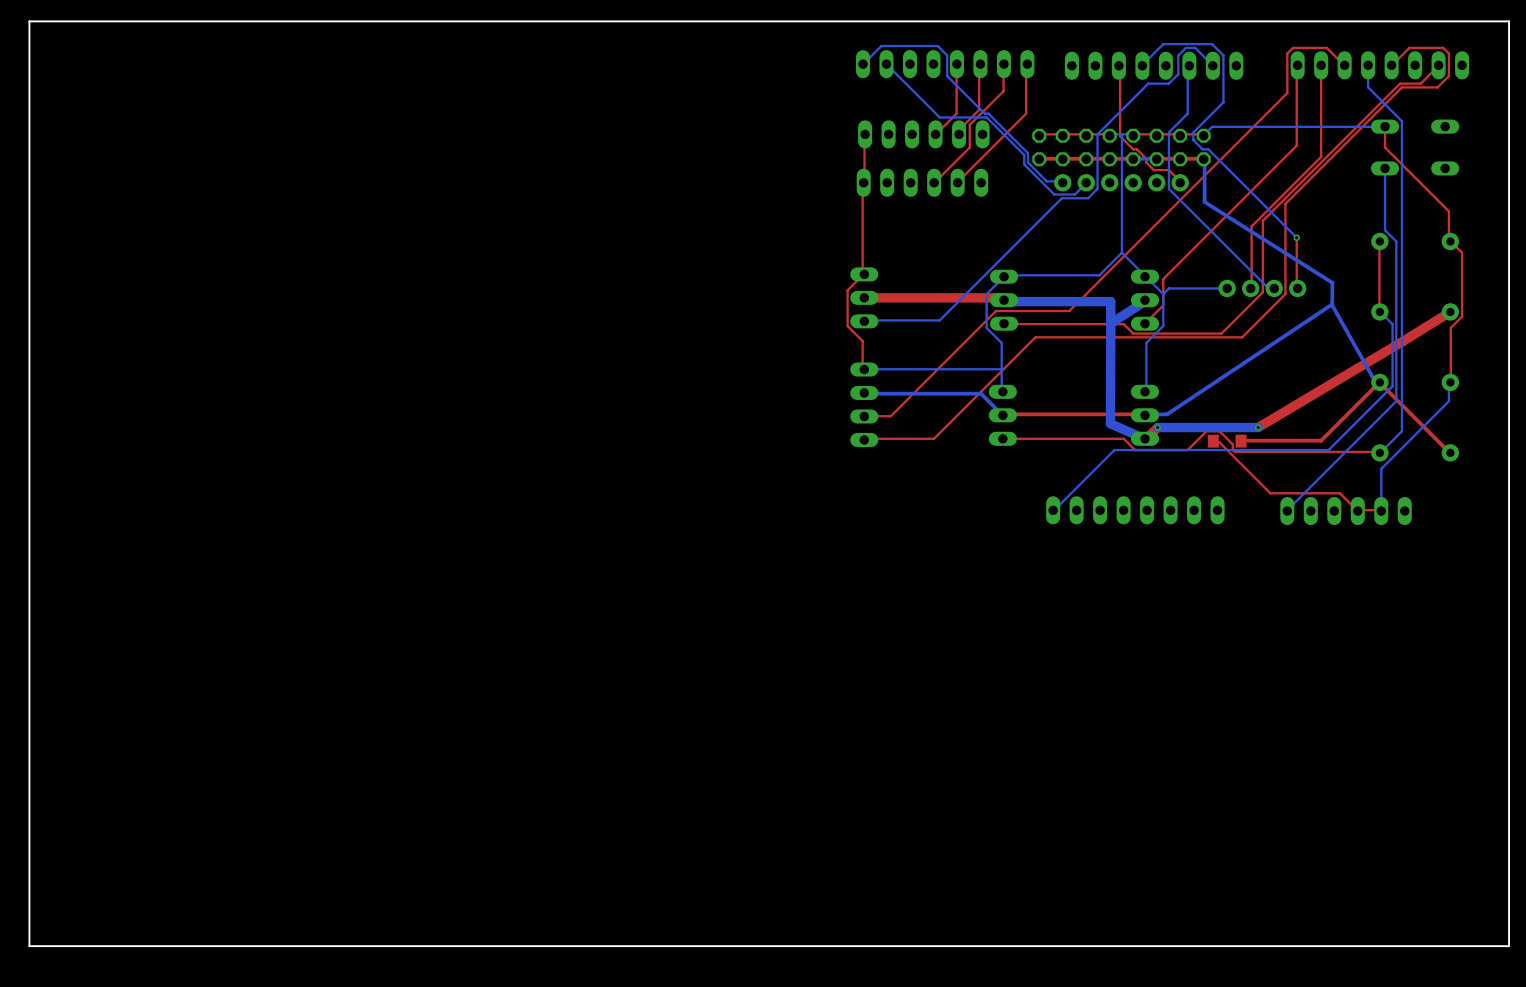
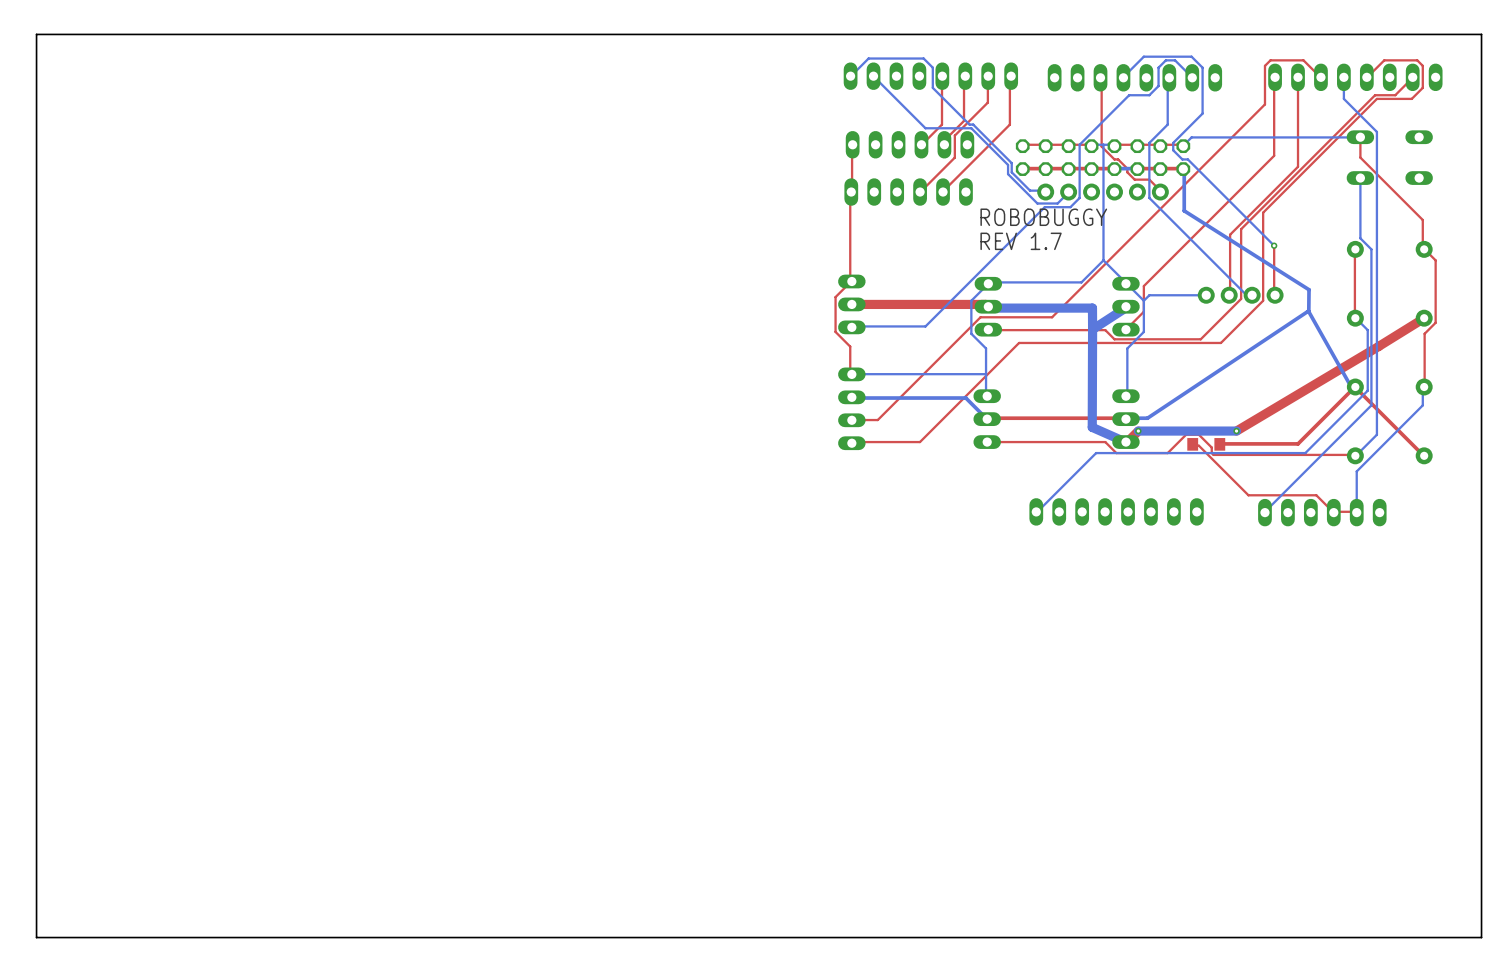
text: none -> ROBOBUGGY (1043, 217)
text: none -> REV 1.7 (1021, 241)

